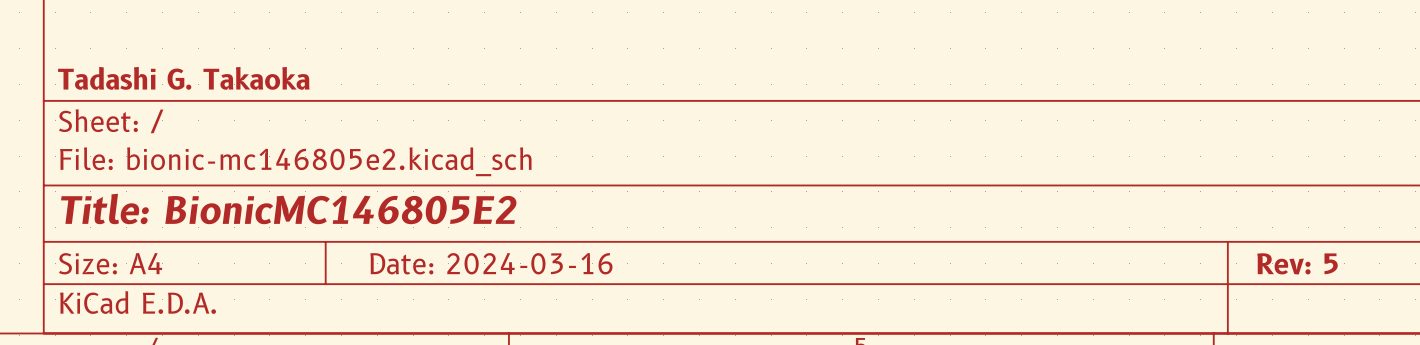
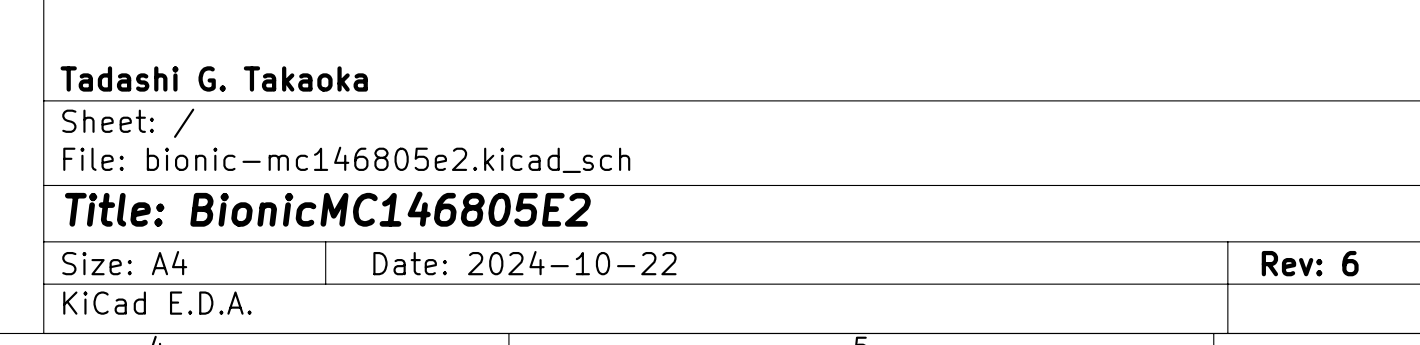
title block: Date: 2024-03-16 (491, 263) -> Date: 2024-10-22 (524, 263)
title block: Rev: 5 (1297, 263) -> Rev: 6 (1310, 263)

